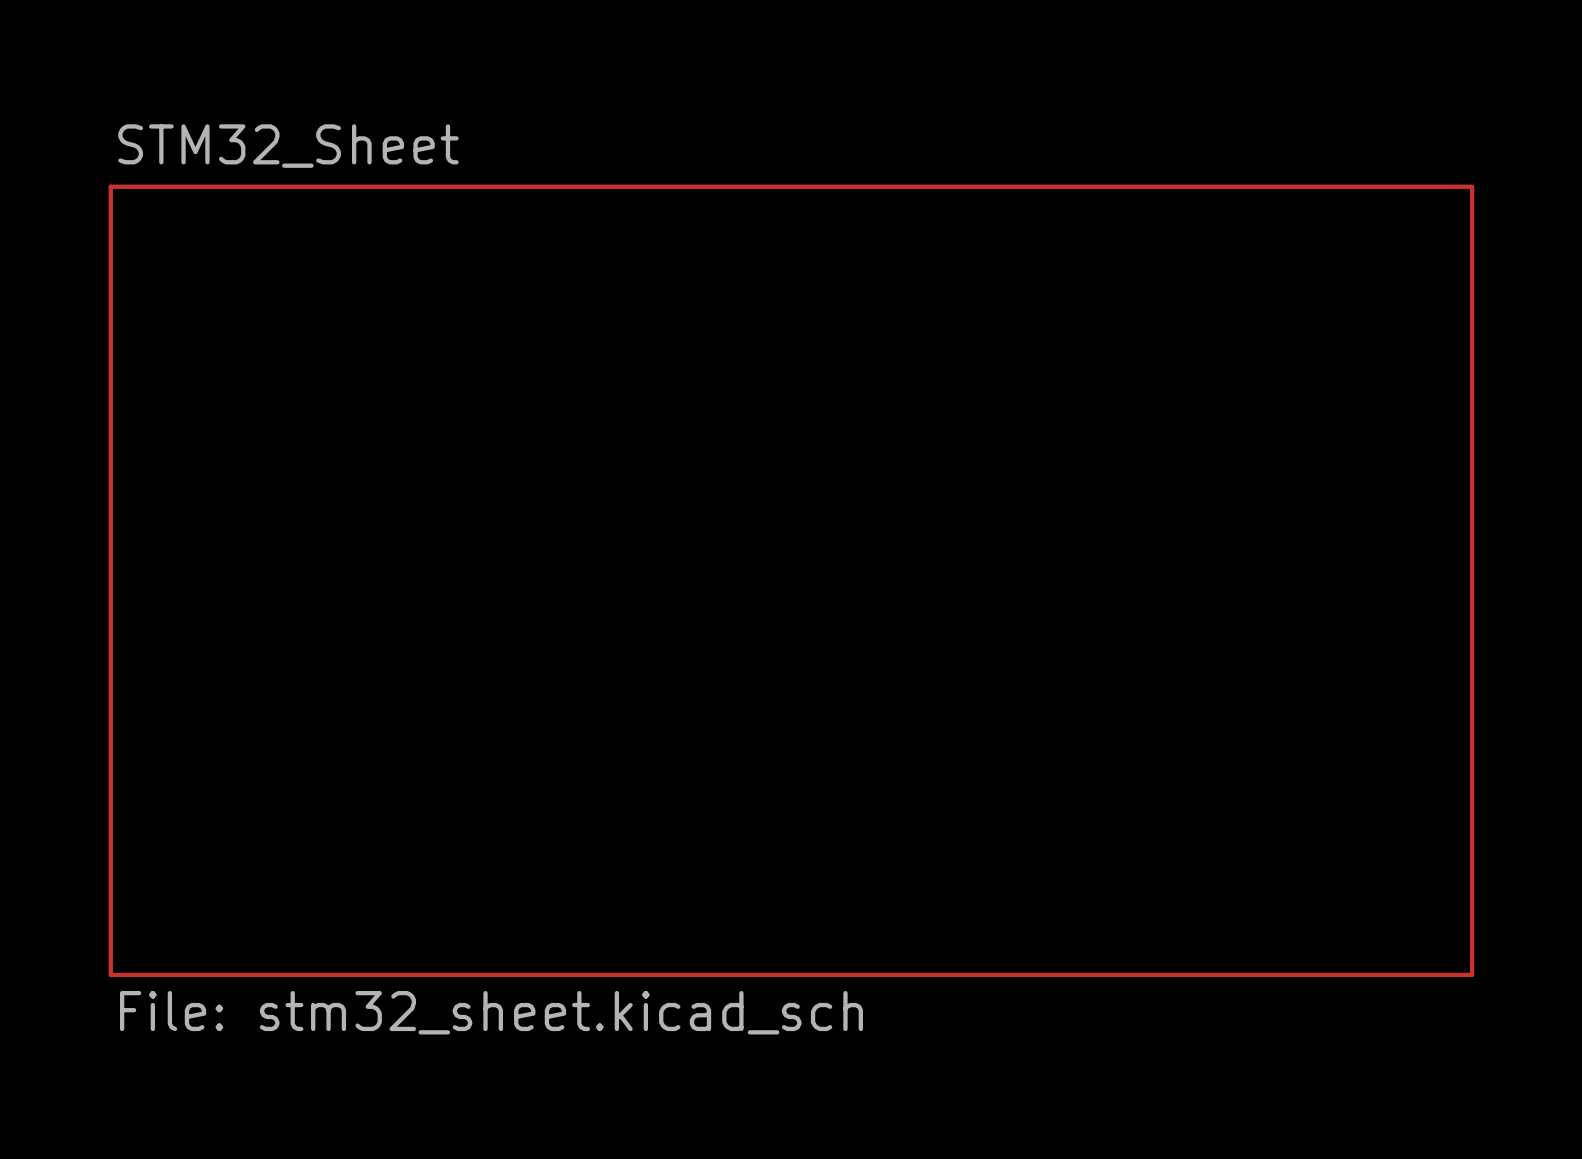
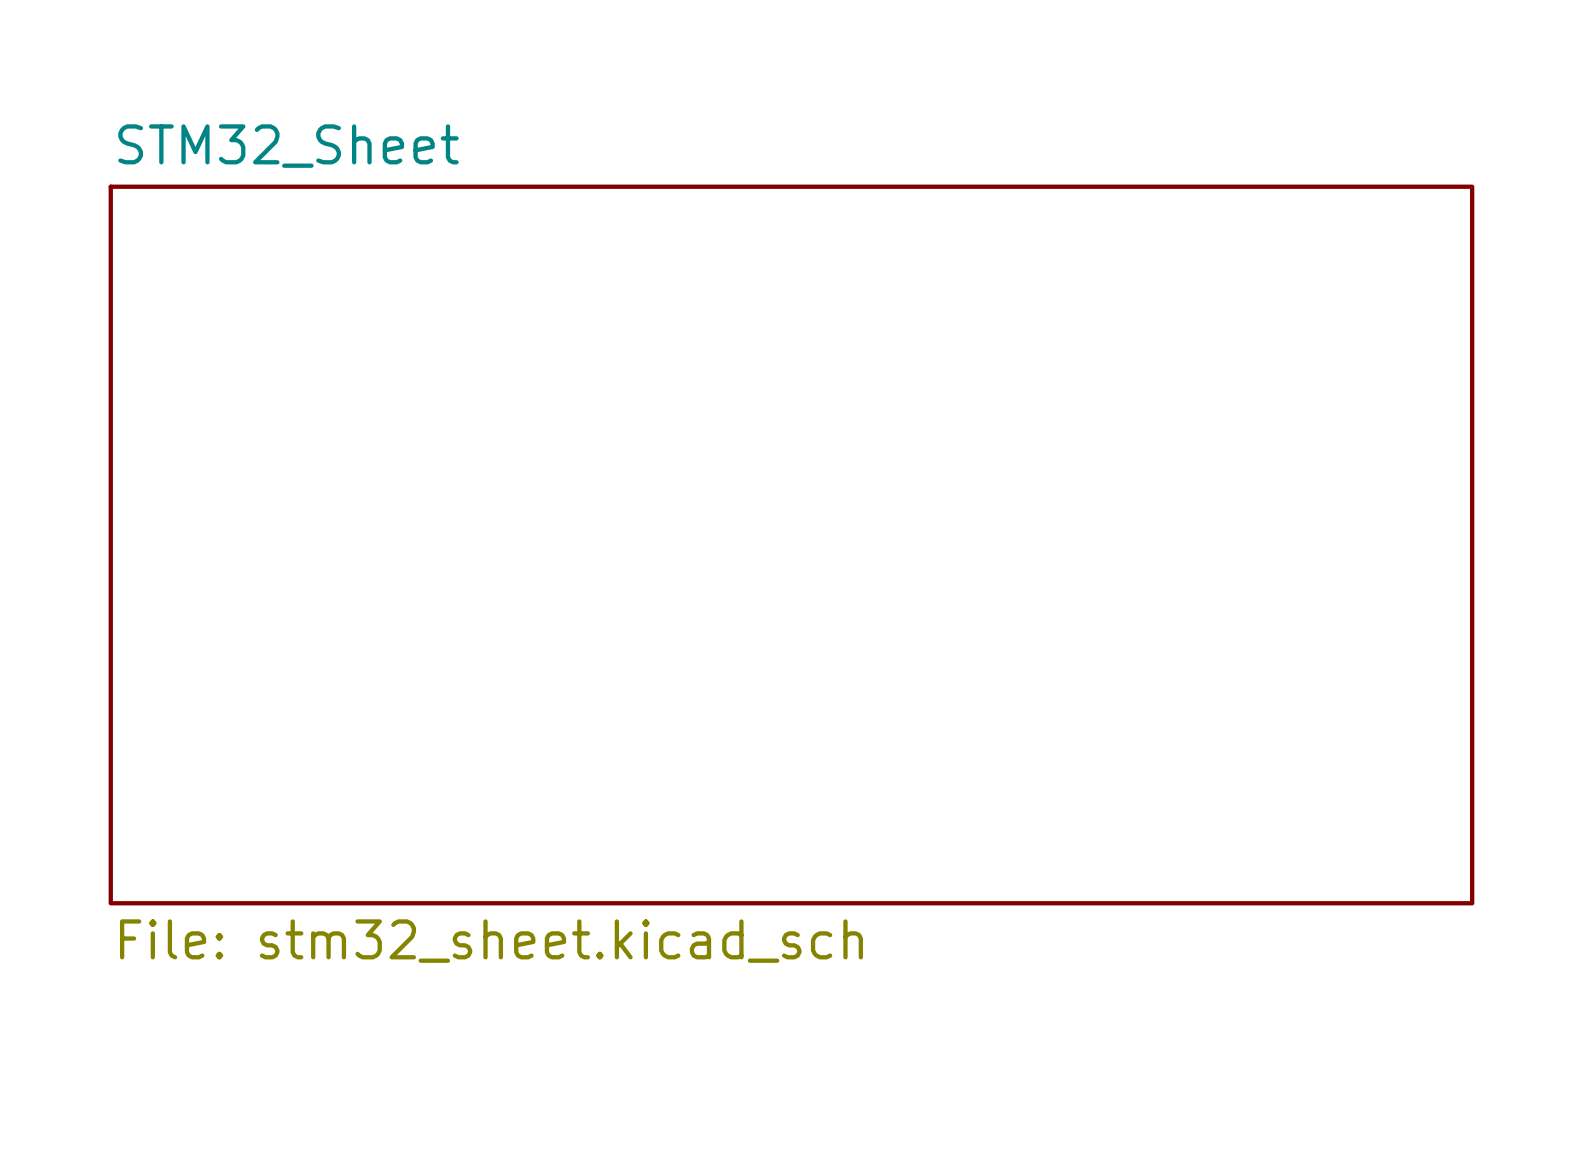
sheet STM32_Sheet shape: [108, 184, 1475, 978] -> [108, 184, 1475, 906]

